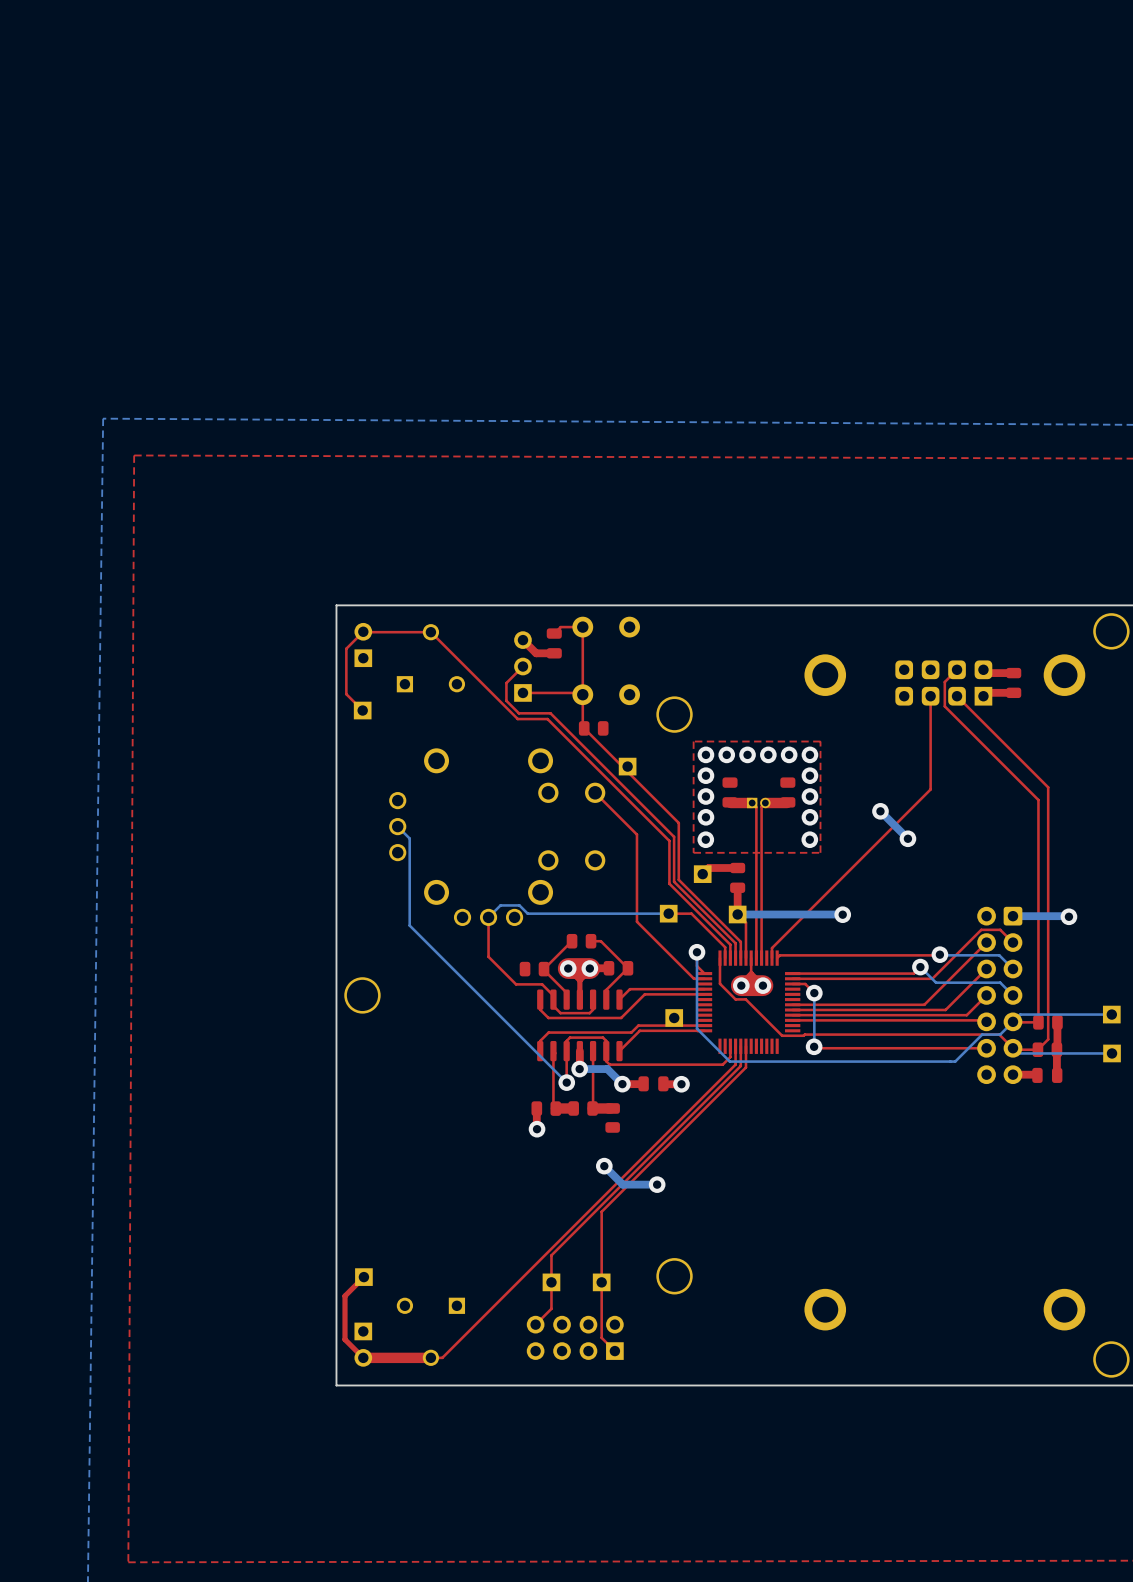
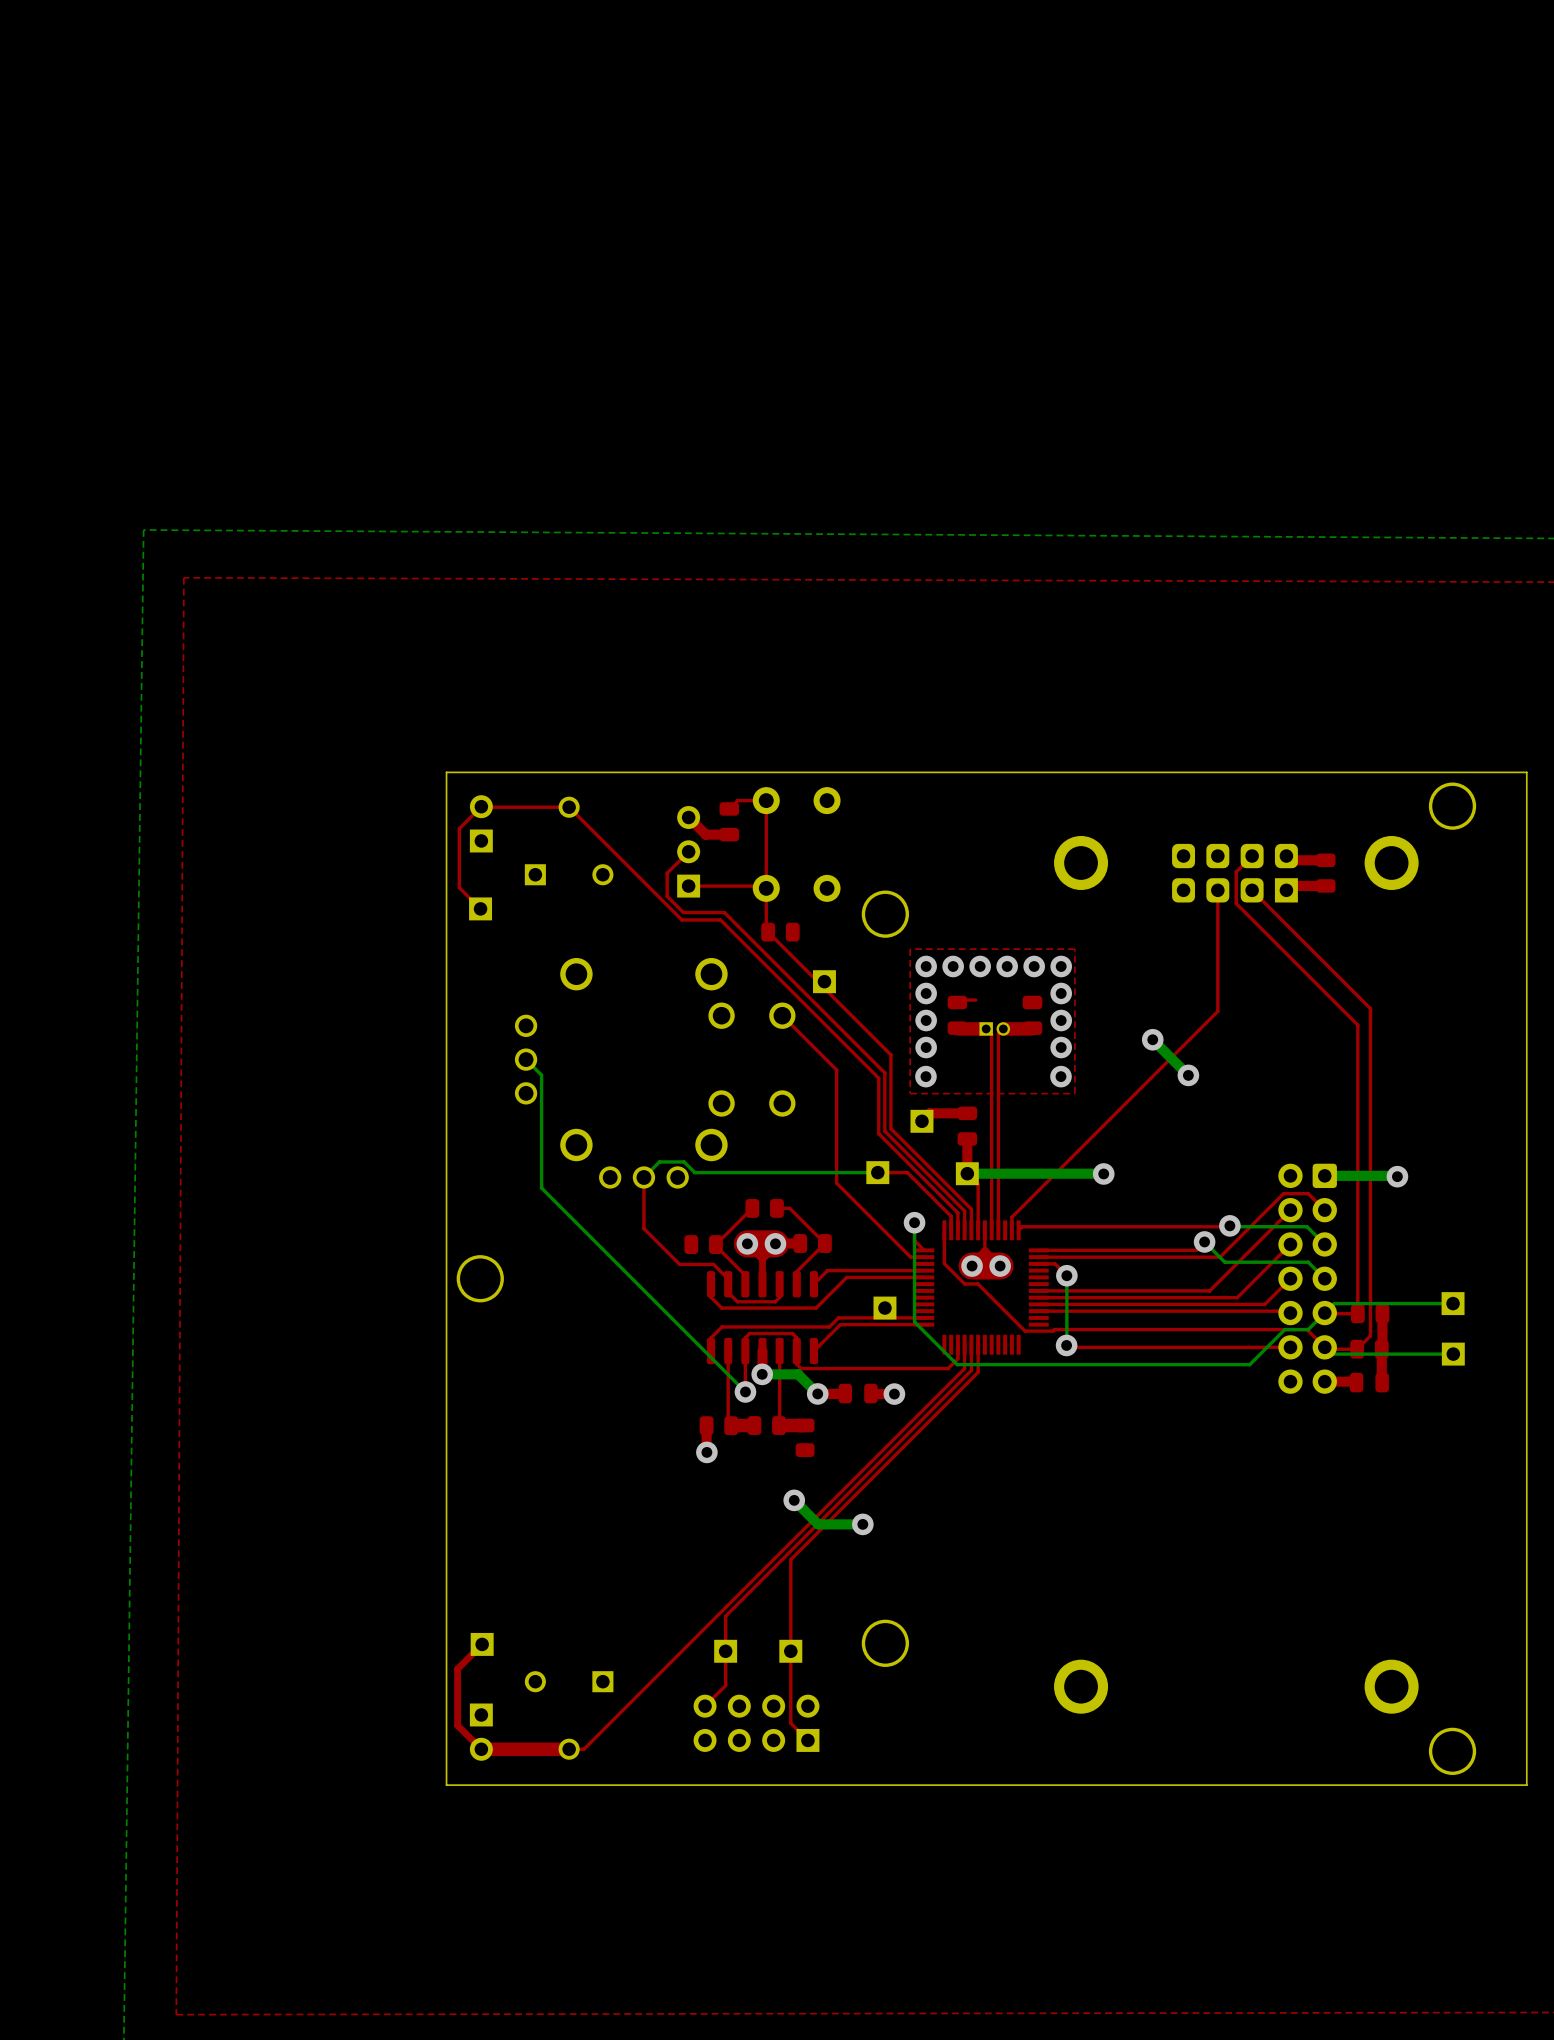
top track: none -> (975, 1000) (954, 1000)

